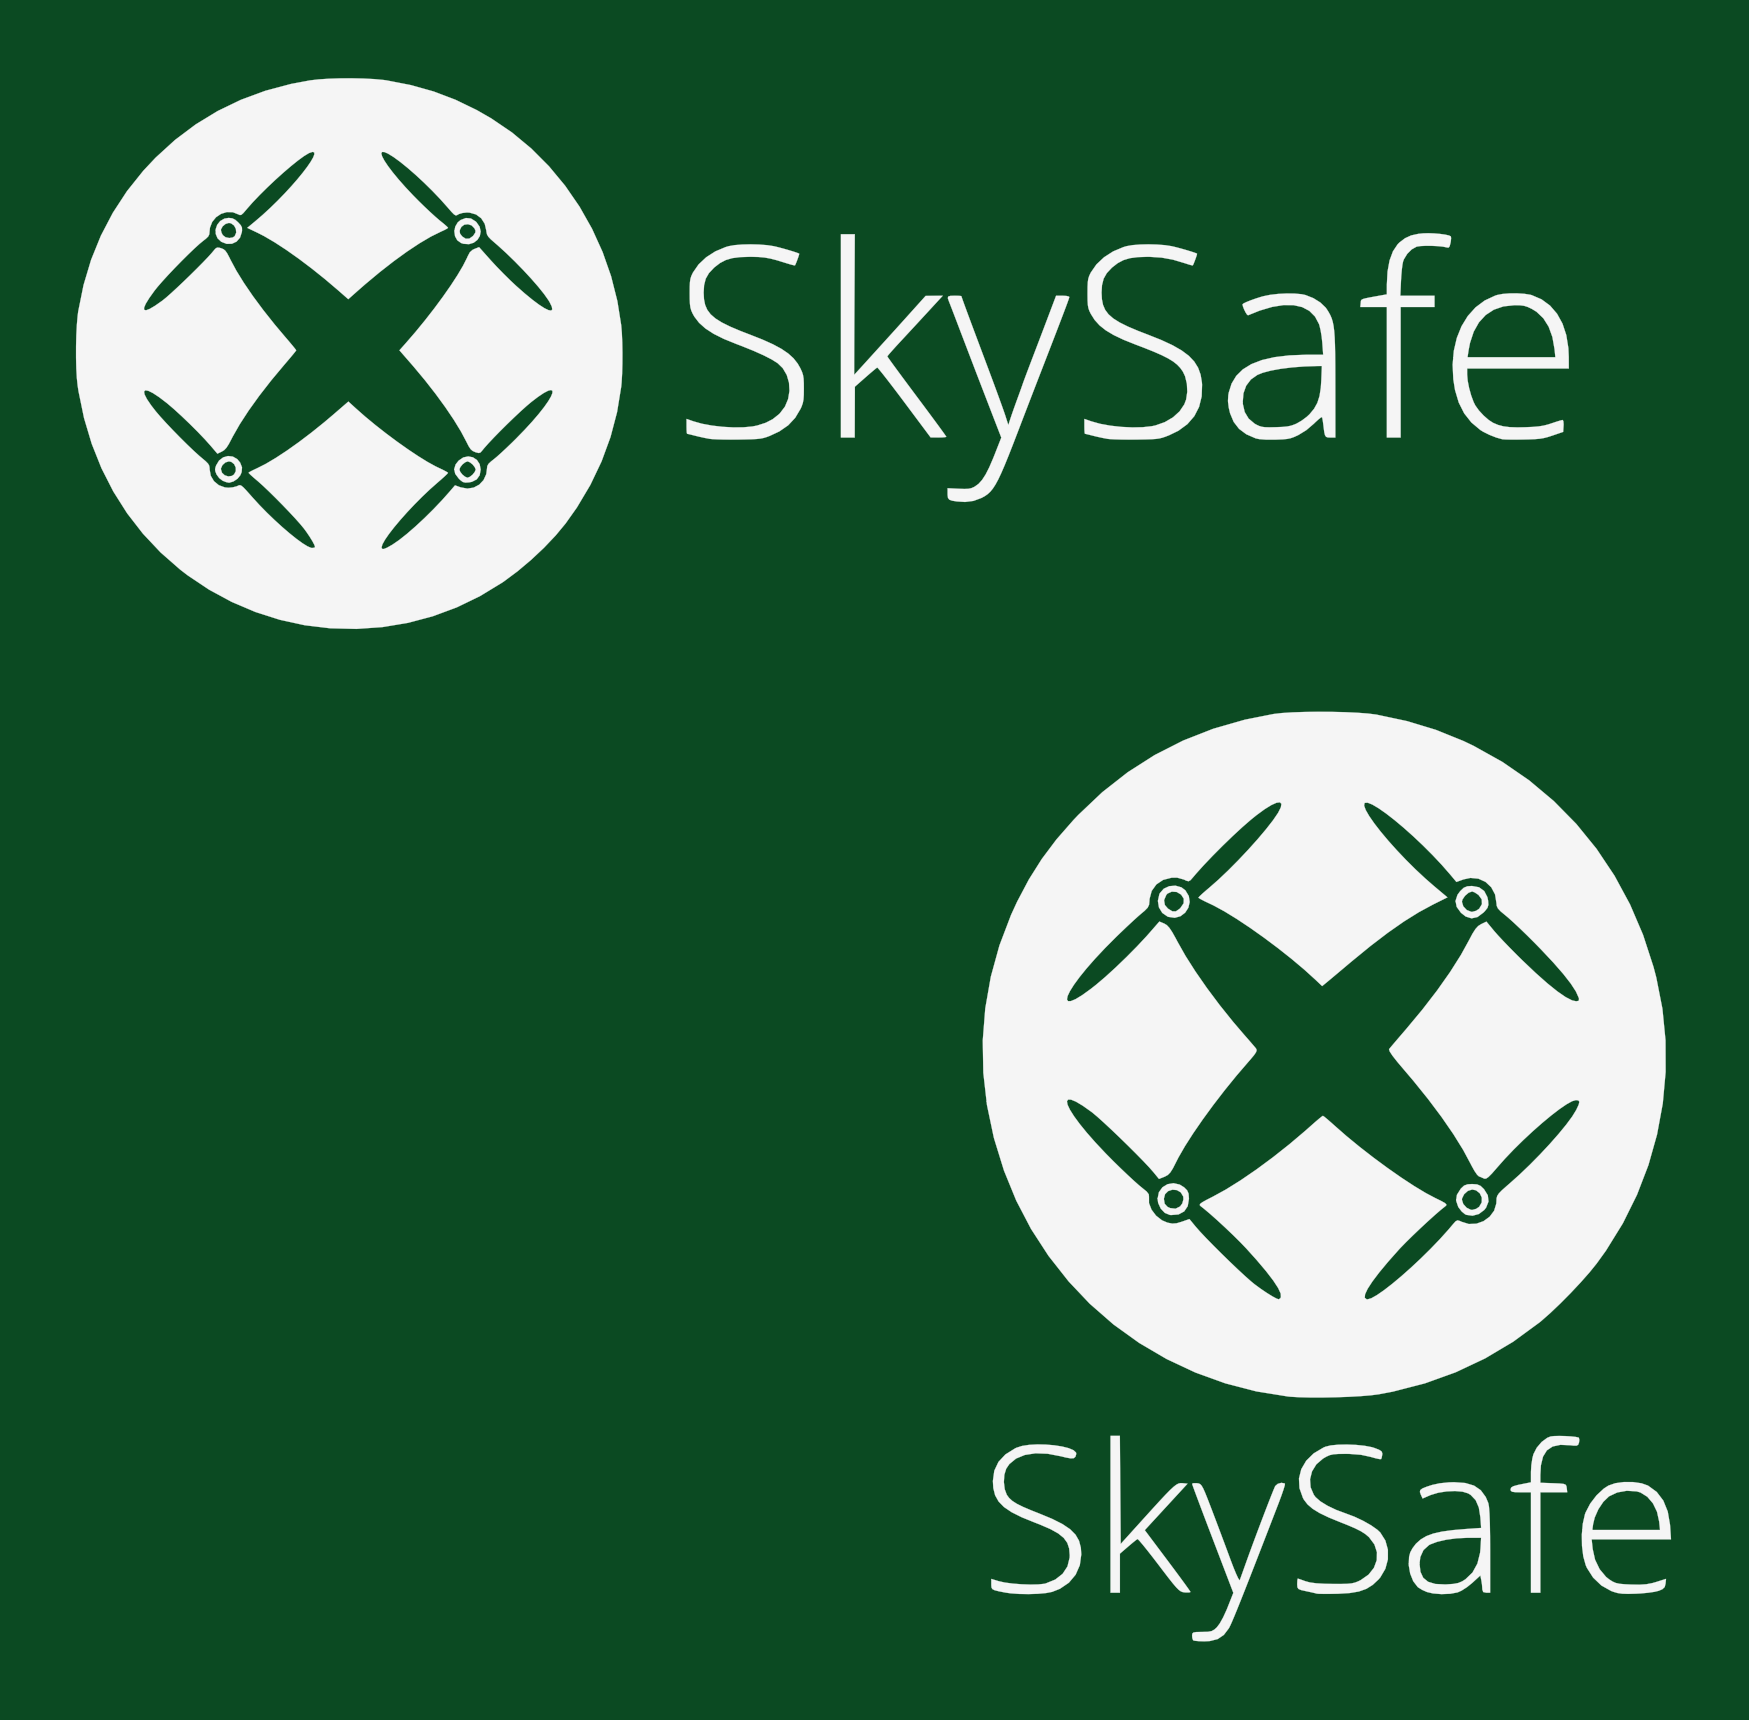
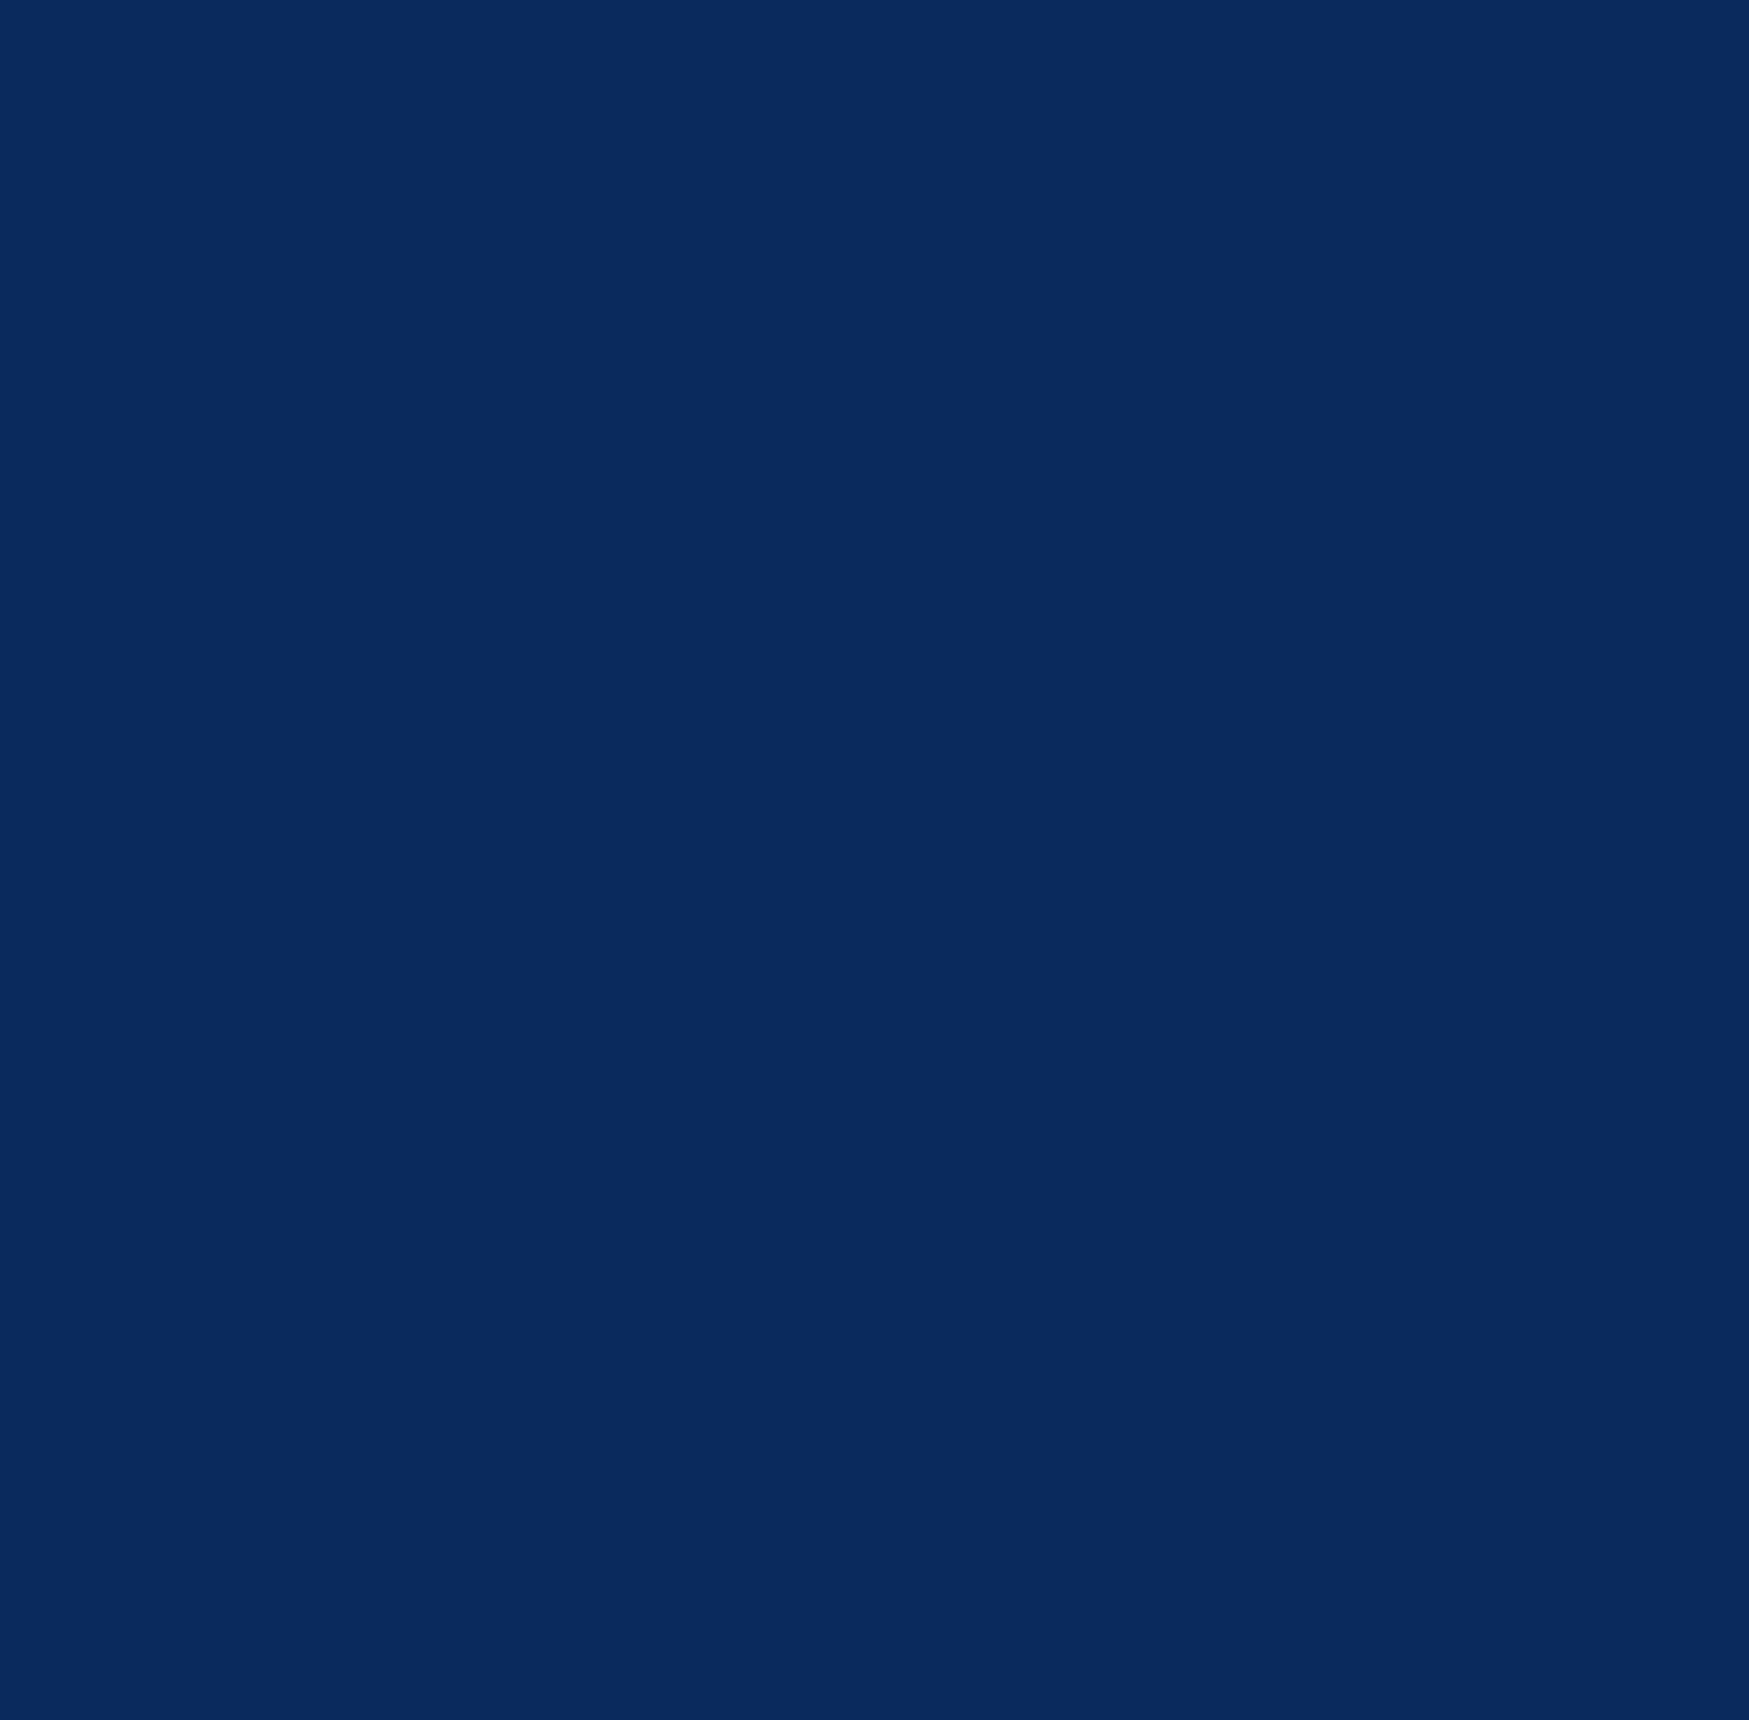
drawing: [75, 78, 1569, 630] -> none
drawing: [982, 711, 1672, 1642] -> none

